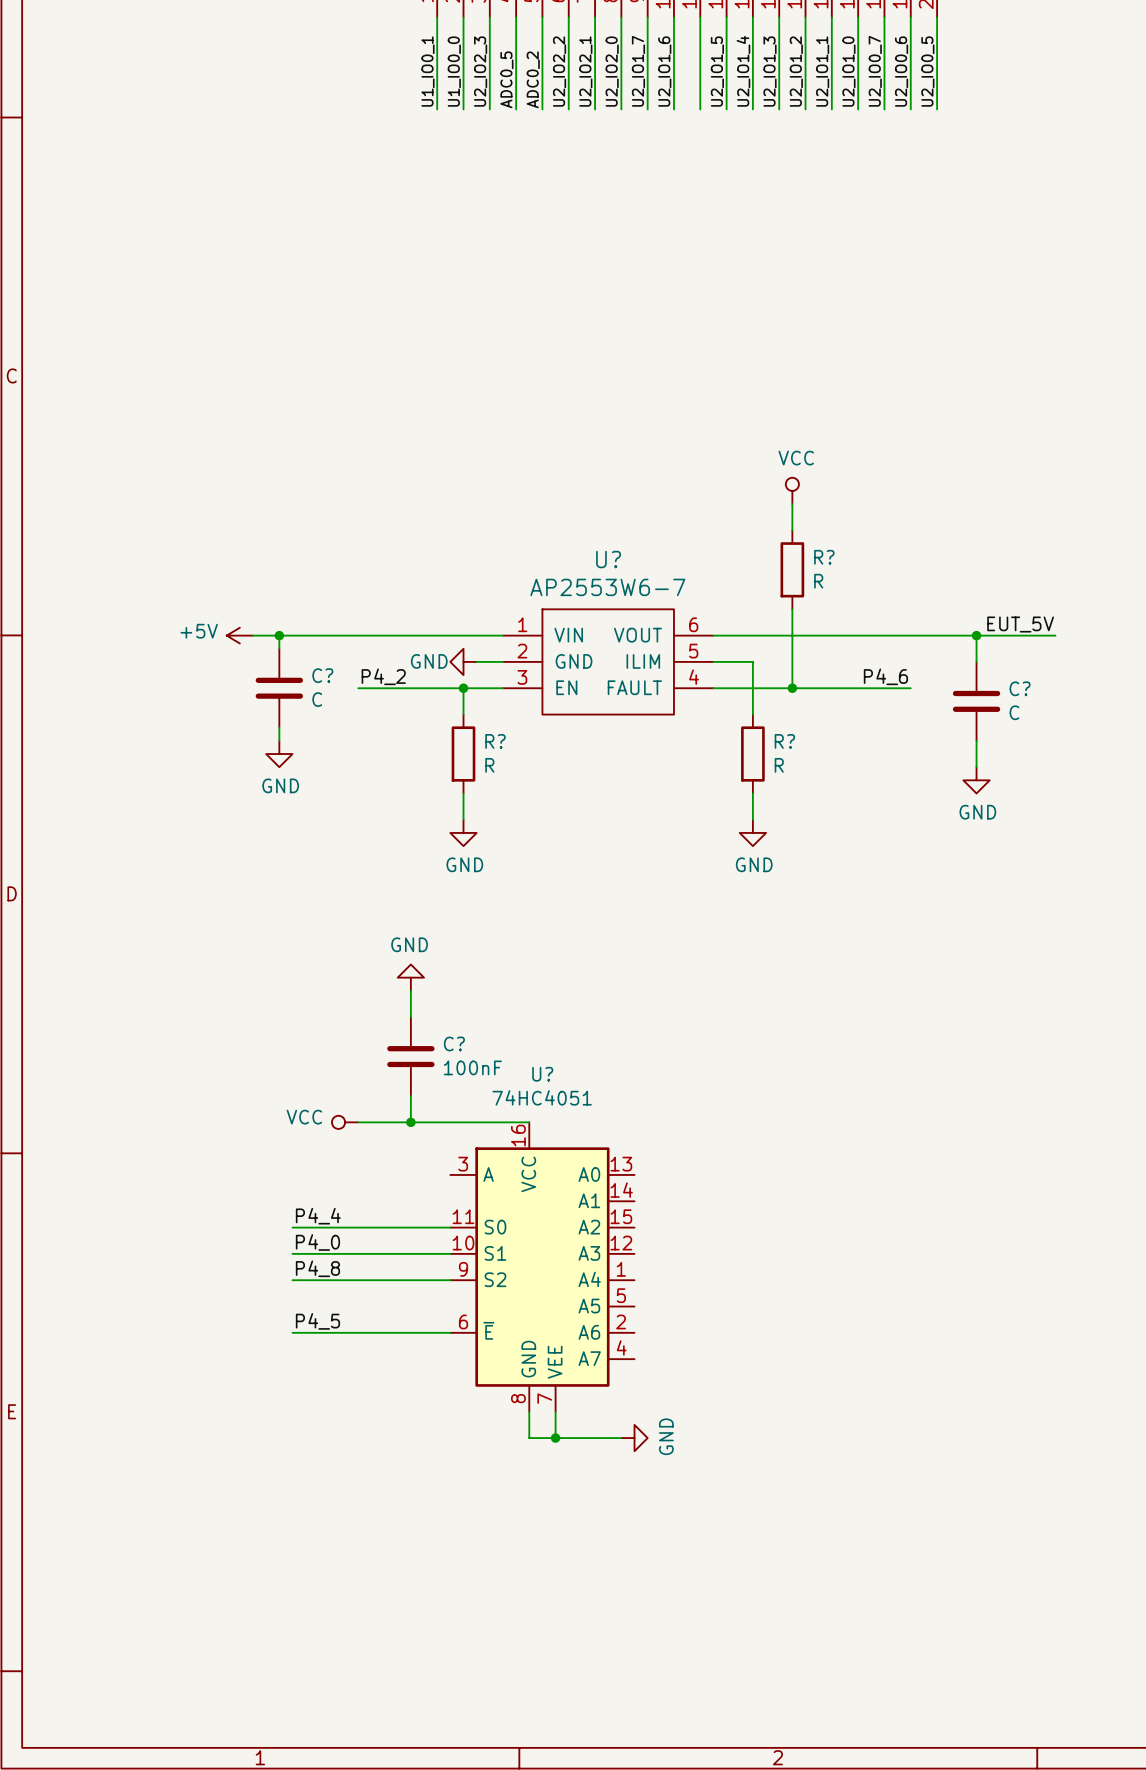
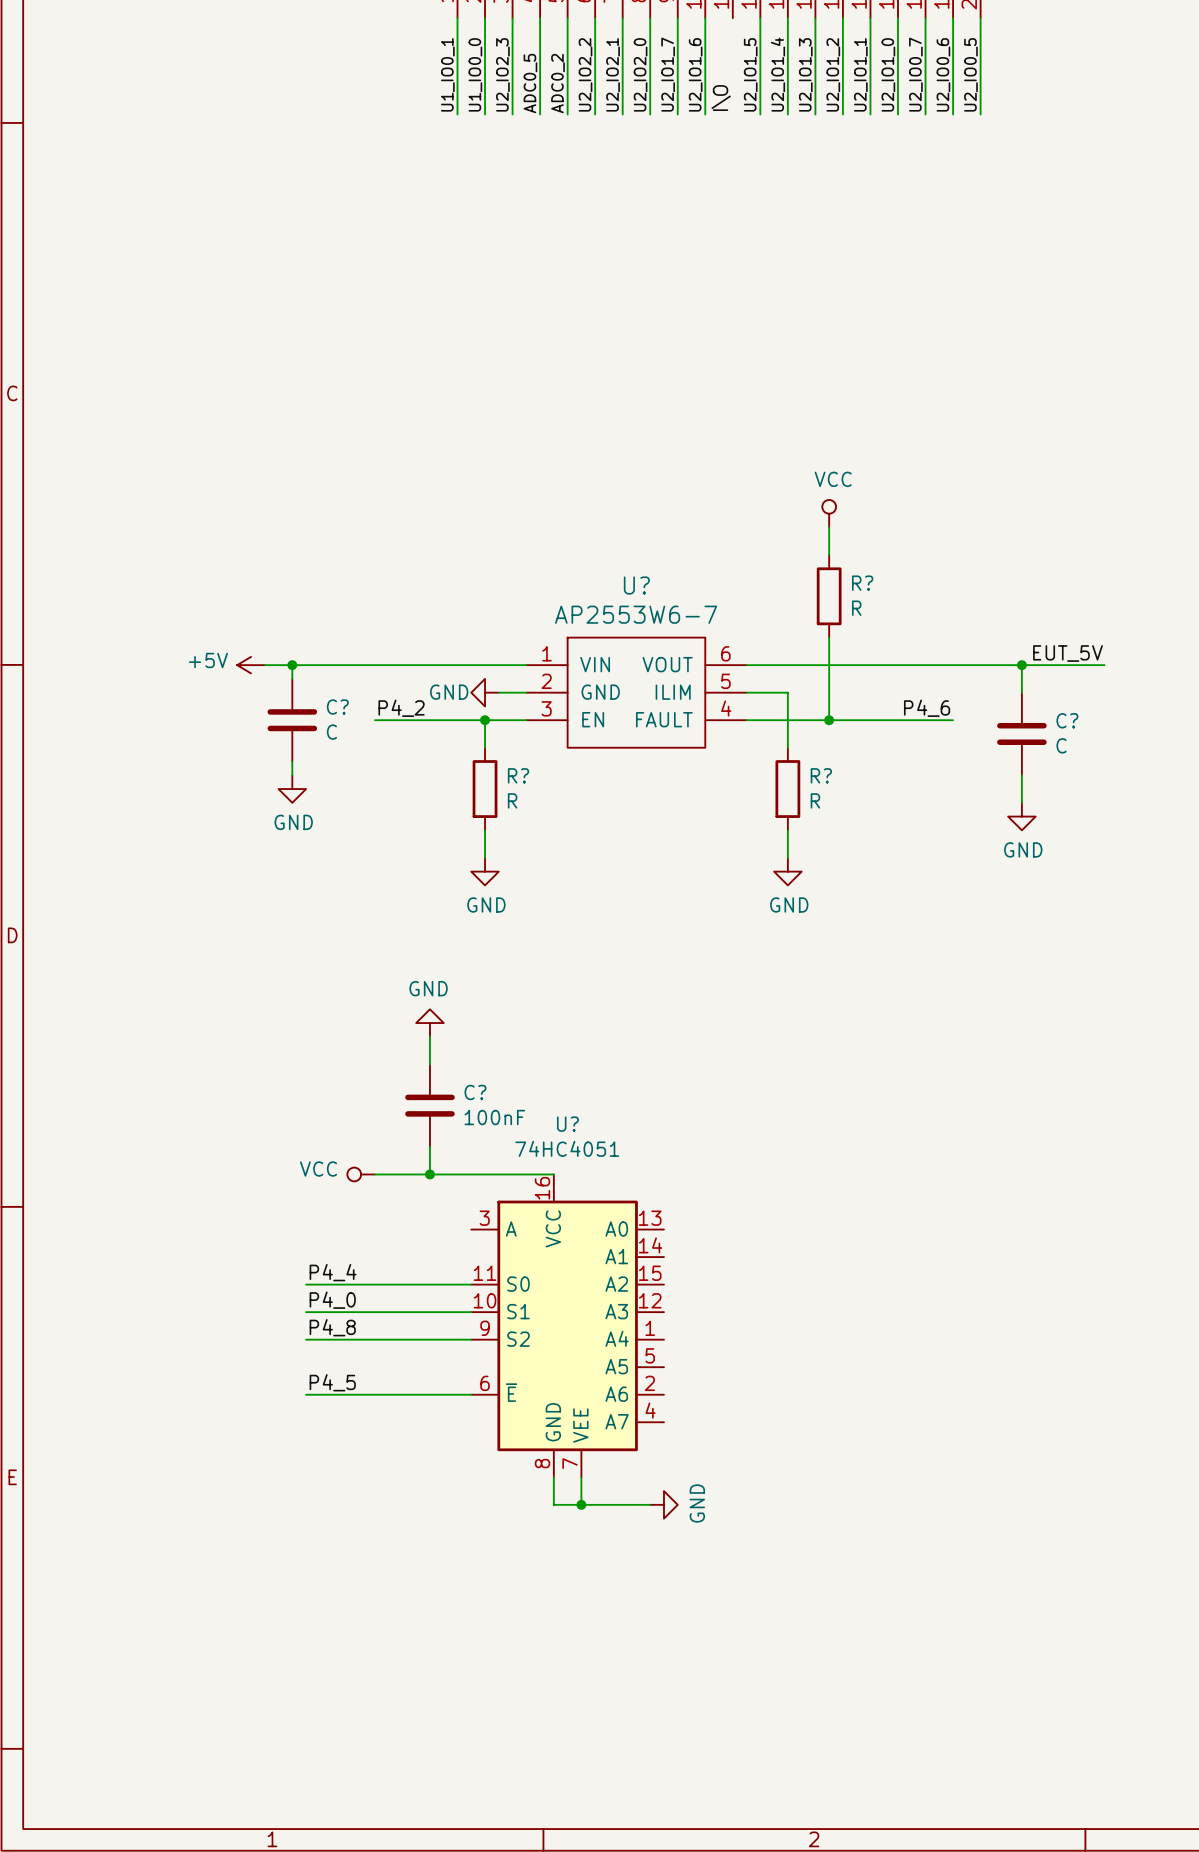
wire: (700, 17) (700, 109) -> none
label: none -> I\O (721, 98)

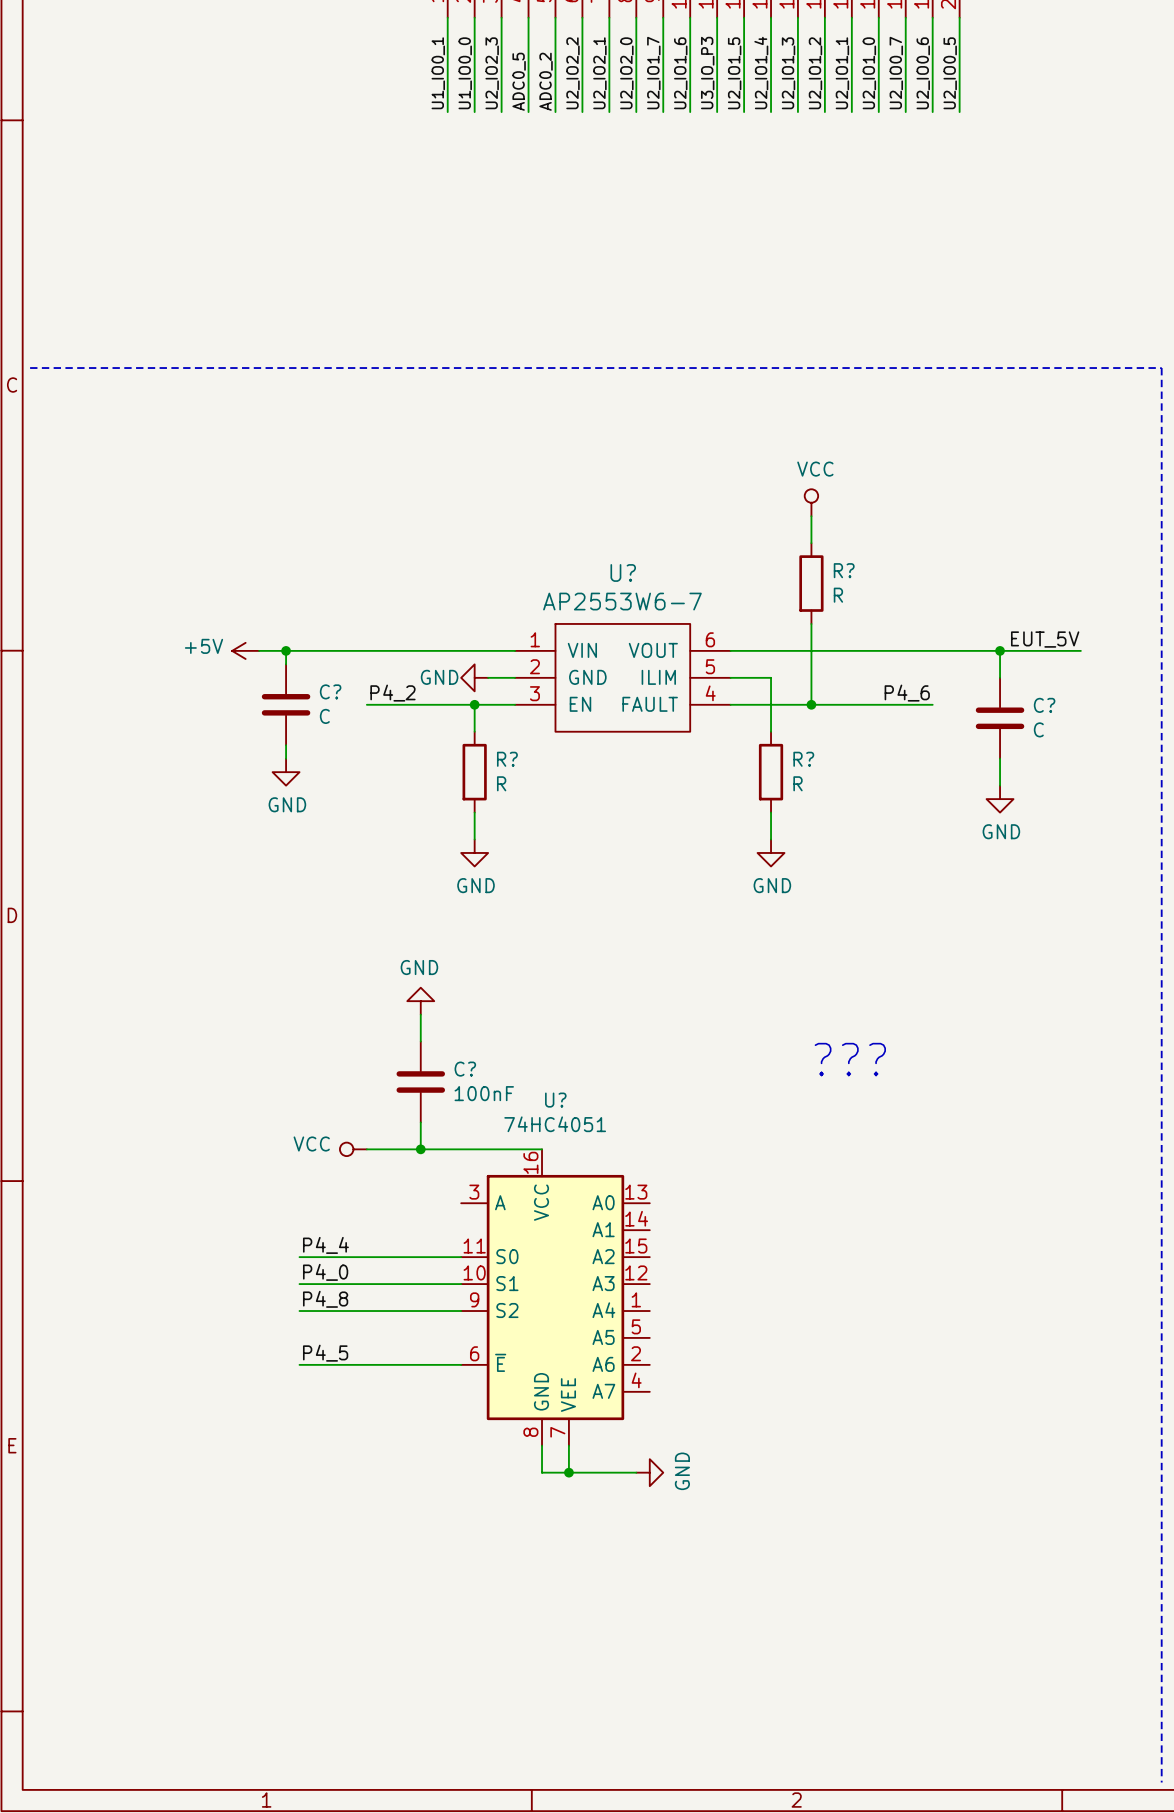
wire: none -> (717, 17) (717, 112)
label: I\O (721, 98) -> U3_IO_P3 (707, 73)
line: none -> (30, 368) (1161, 368) (1161, 1782)
text: none -> ??? (850, 1059)

